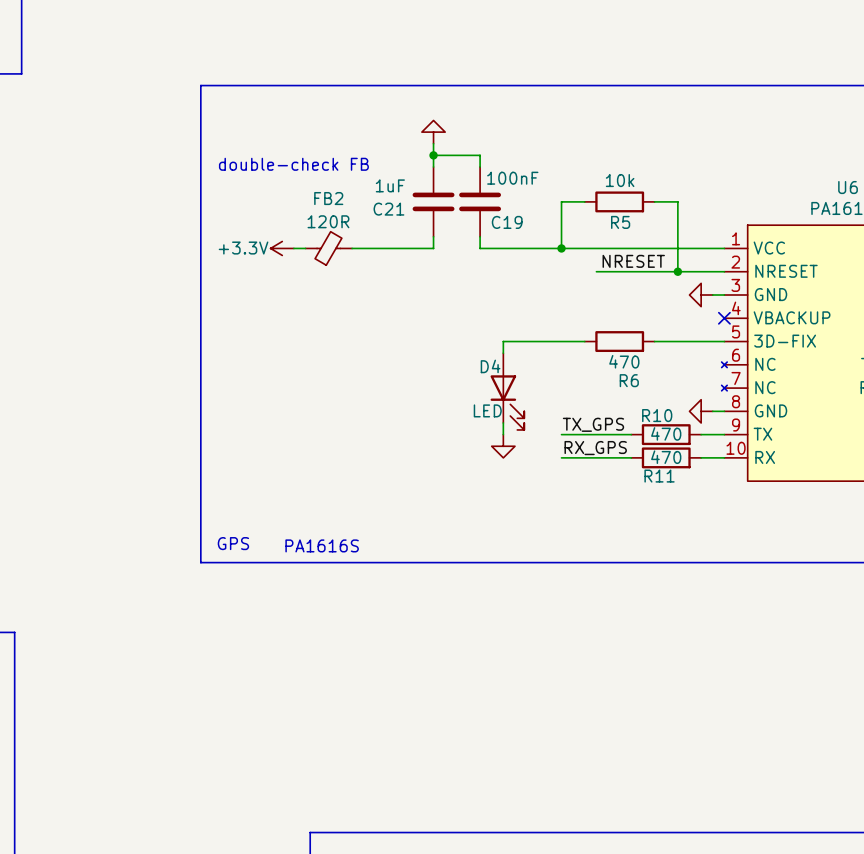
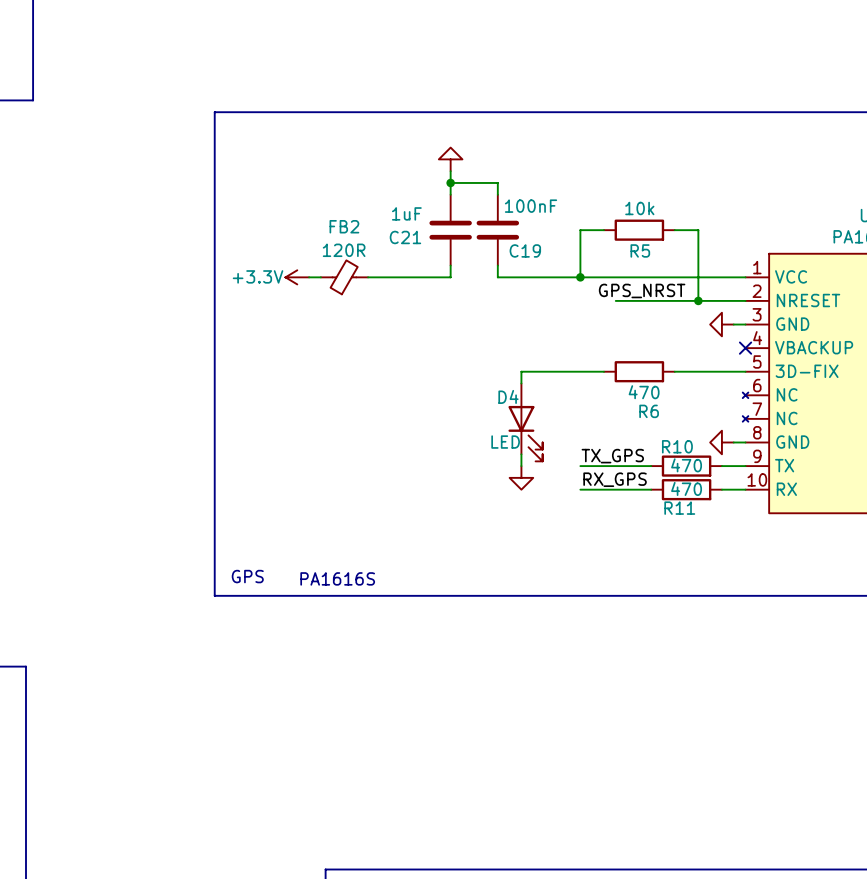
text: double-check FB (293, 164) -> none
label: NRESET (633, 261) -> GPS_NRST (642, 290)

